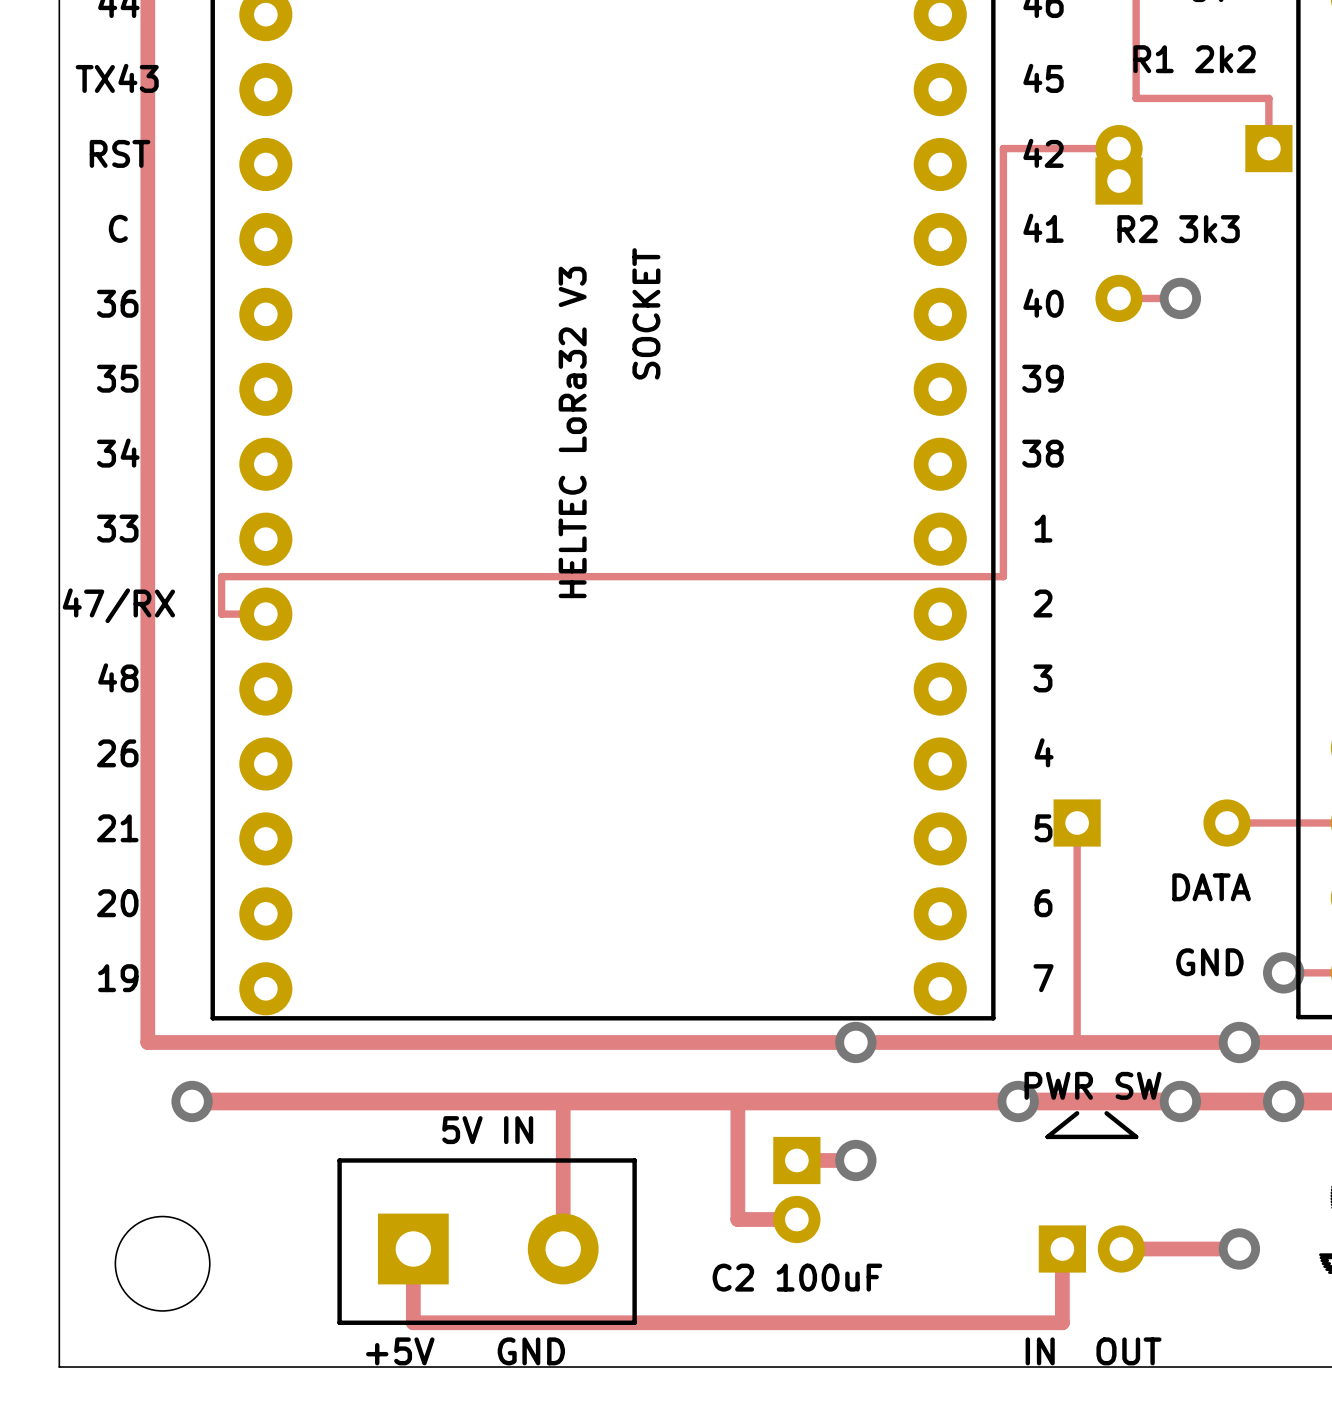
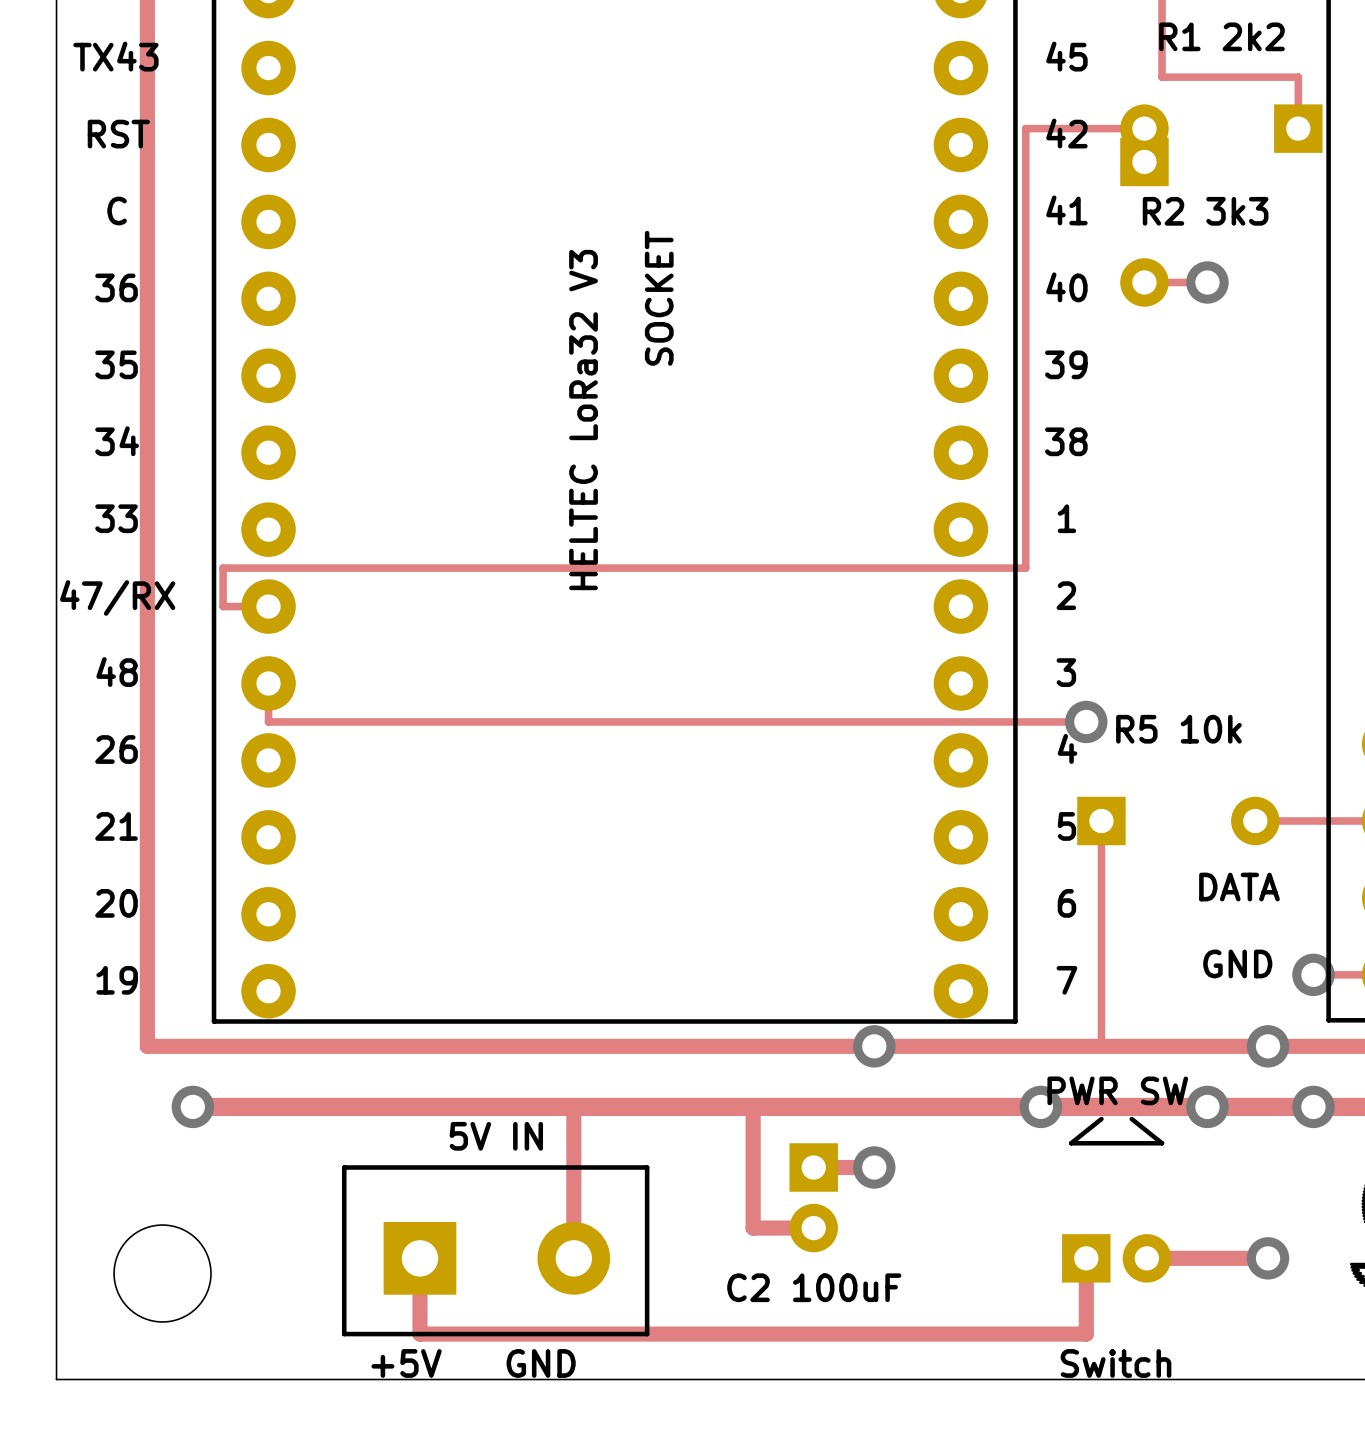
track: none -> (268, 683) (268, 721) (1086, 721)
via: none -> (1086, 721)
text: none -> R5 10k (1178, 729)
text: IN OUT (1093, 1351) -> Switch (1116, 1363)

